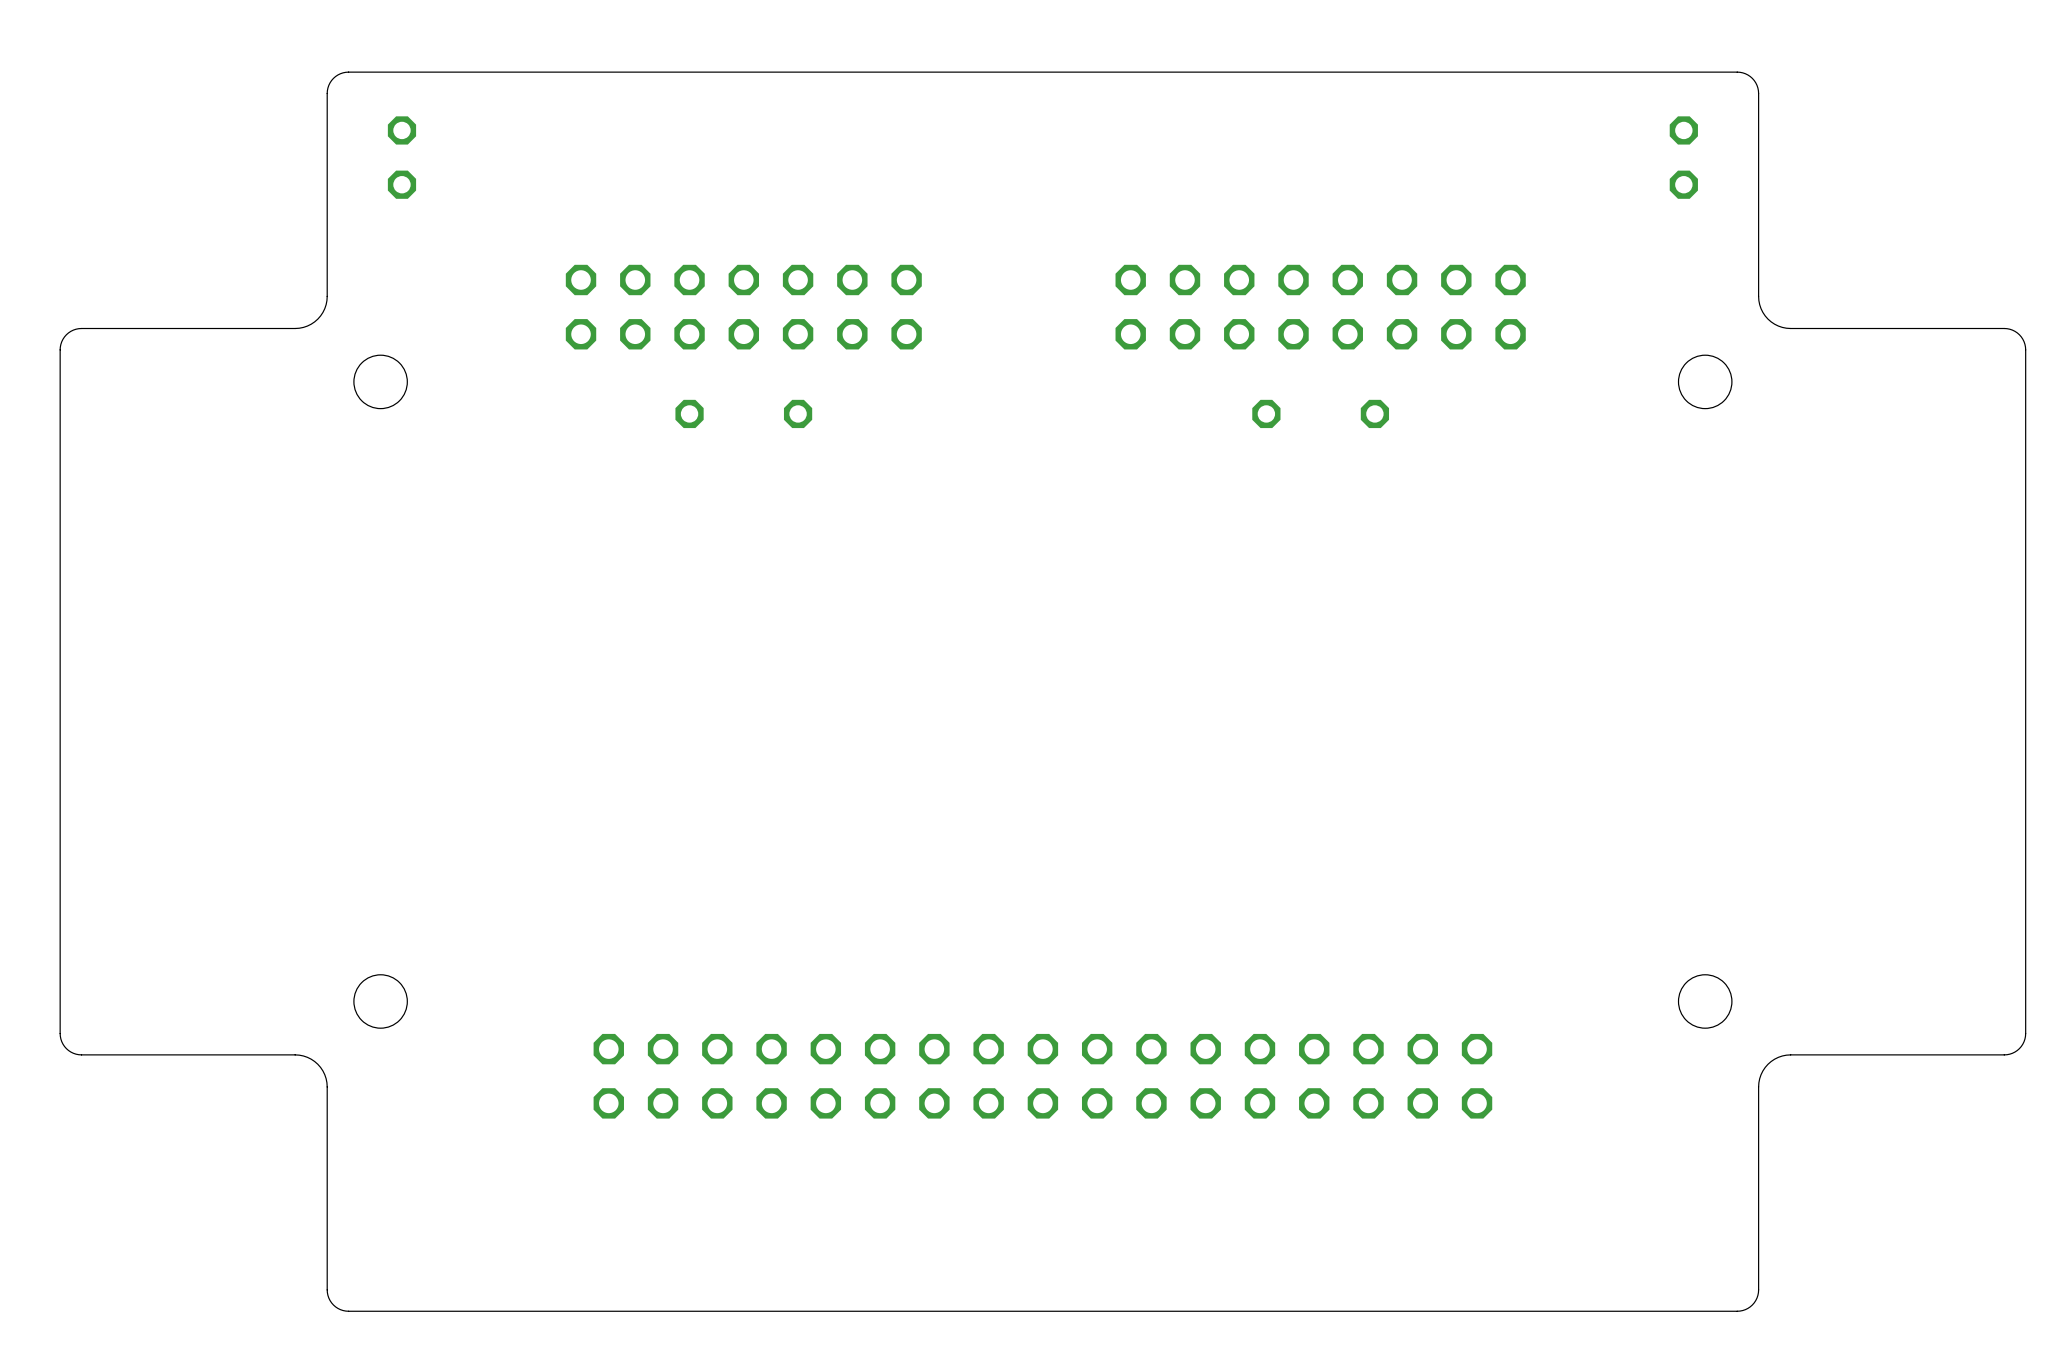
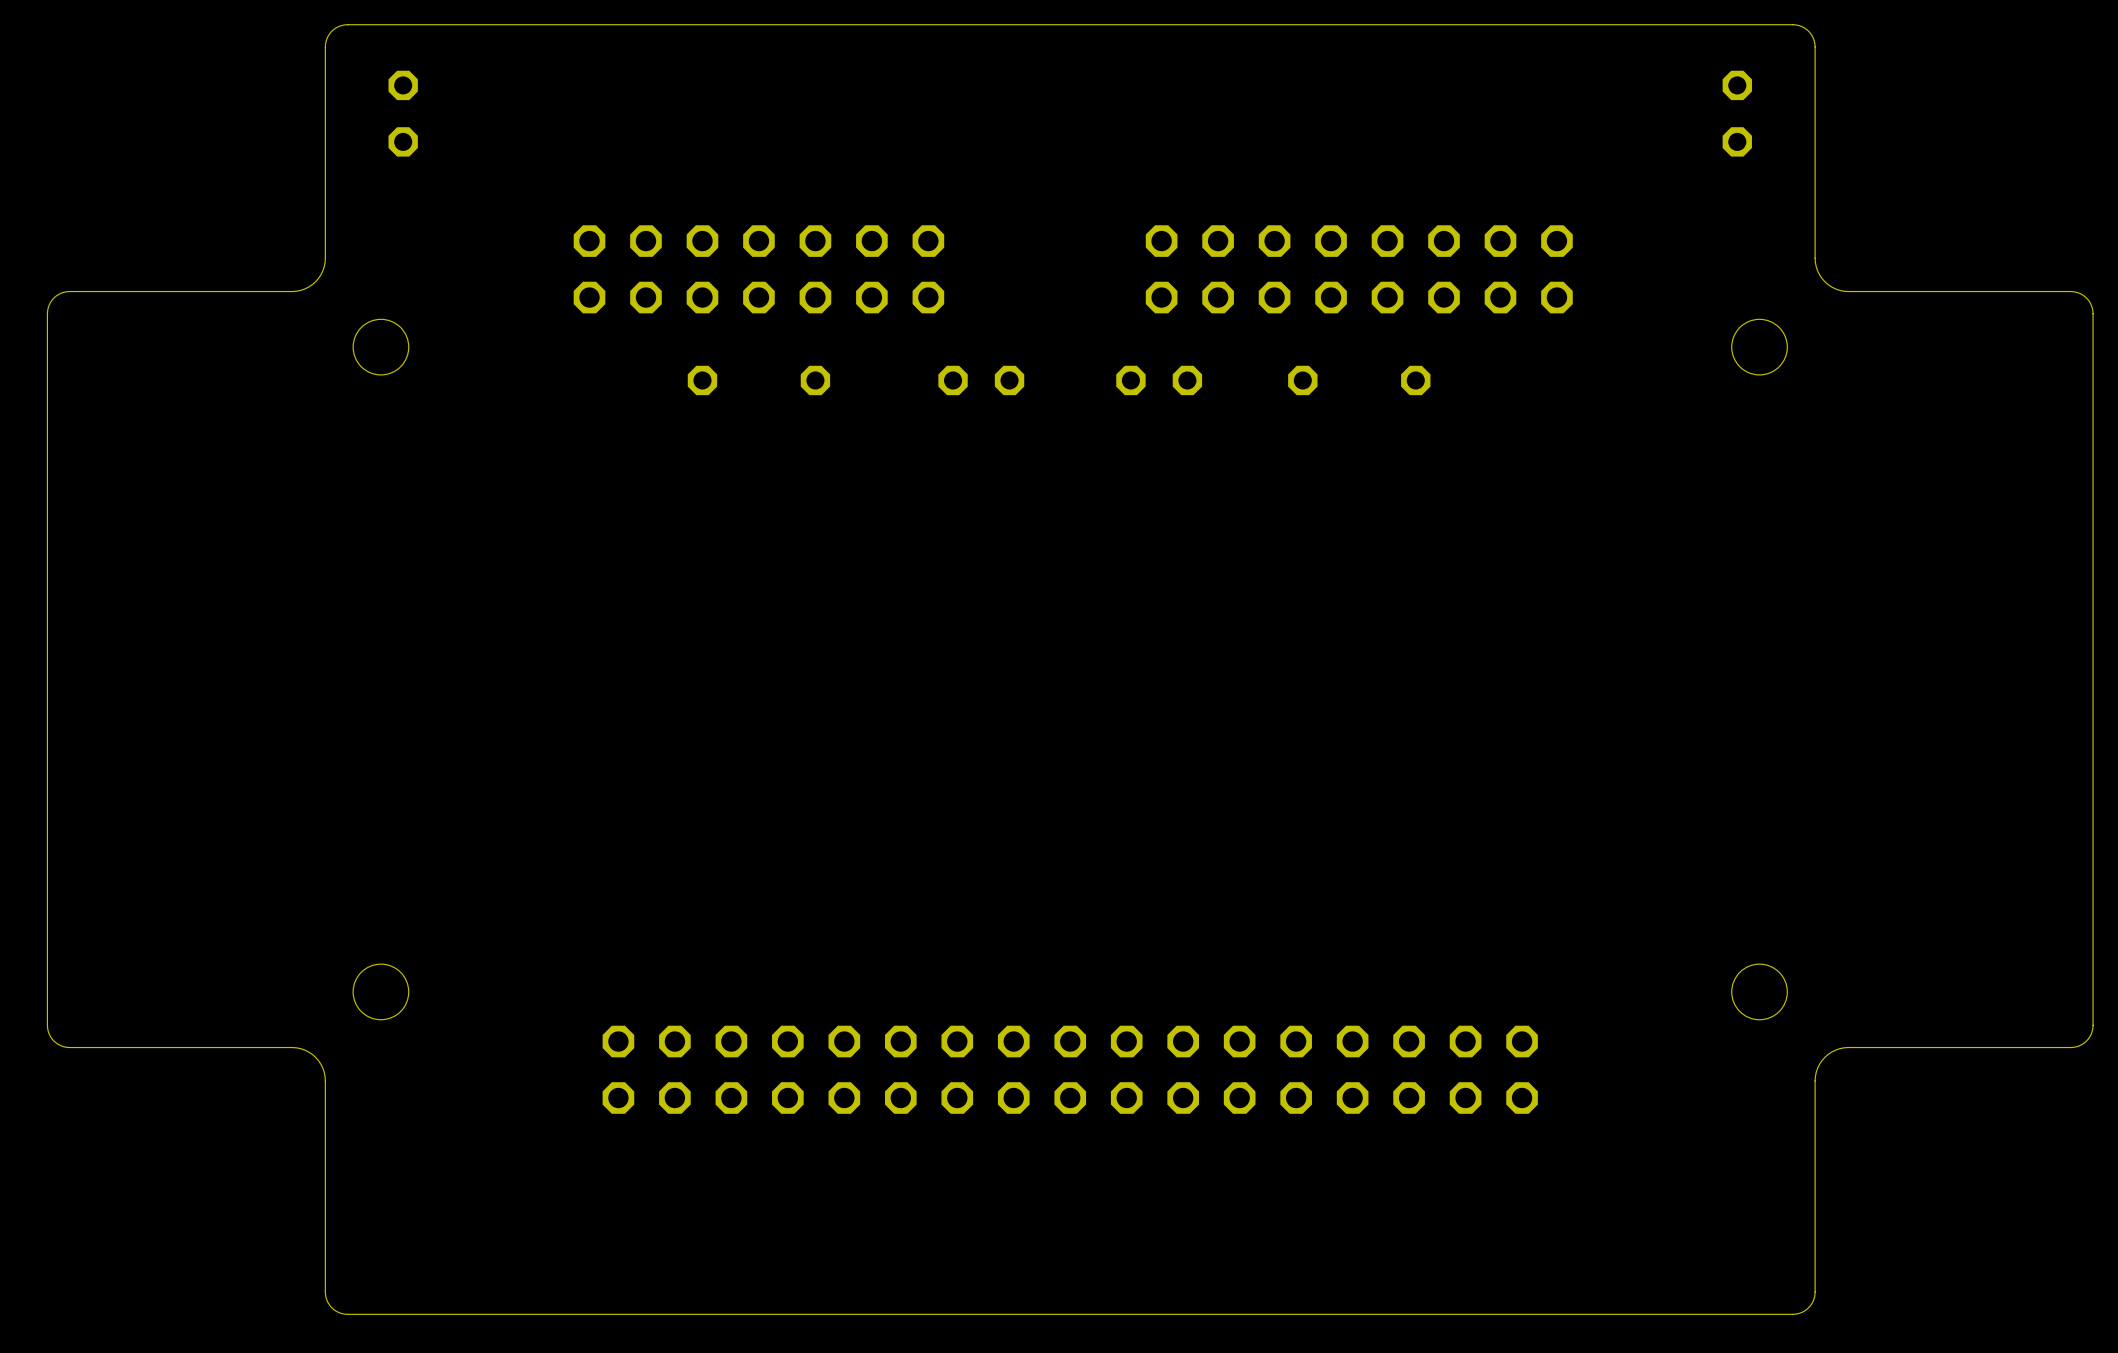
part: none -> (981, 380)
part: none -> (1159, 380)

